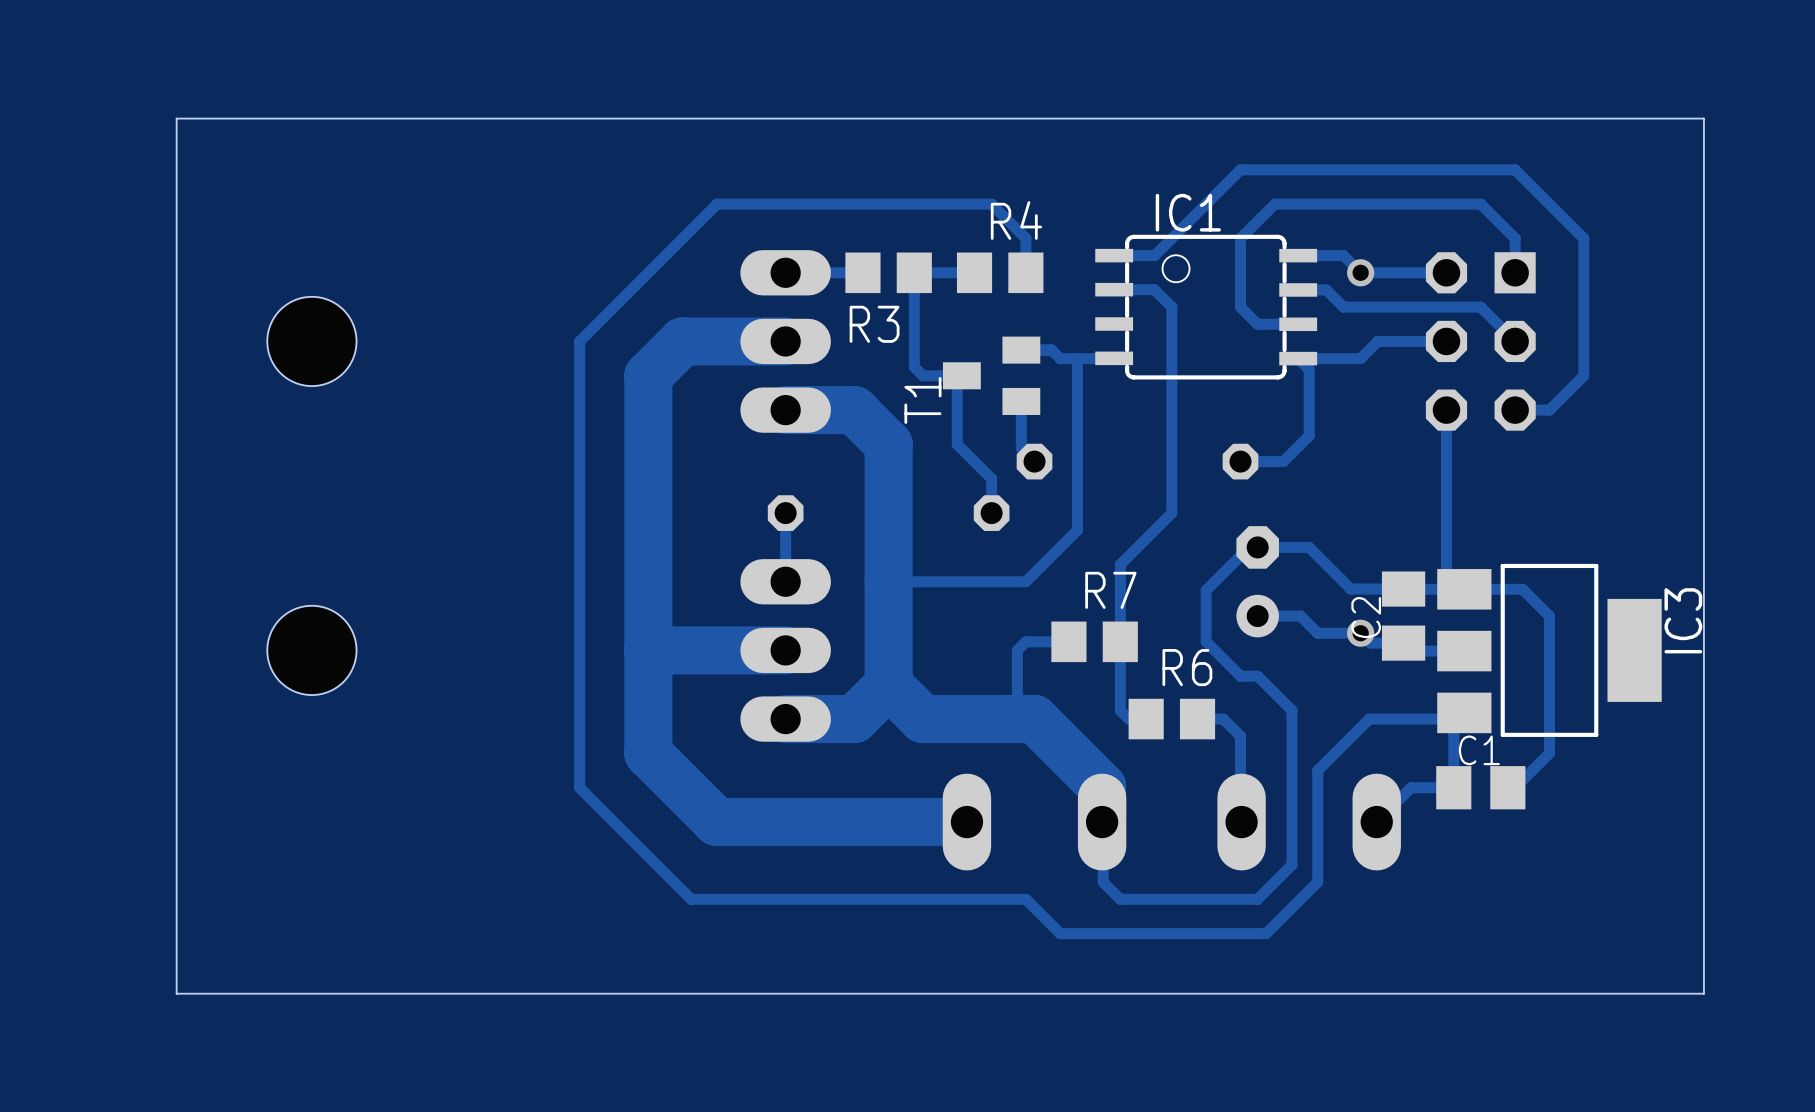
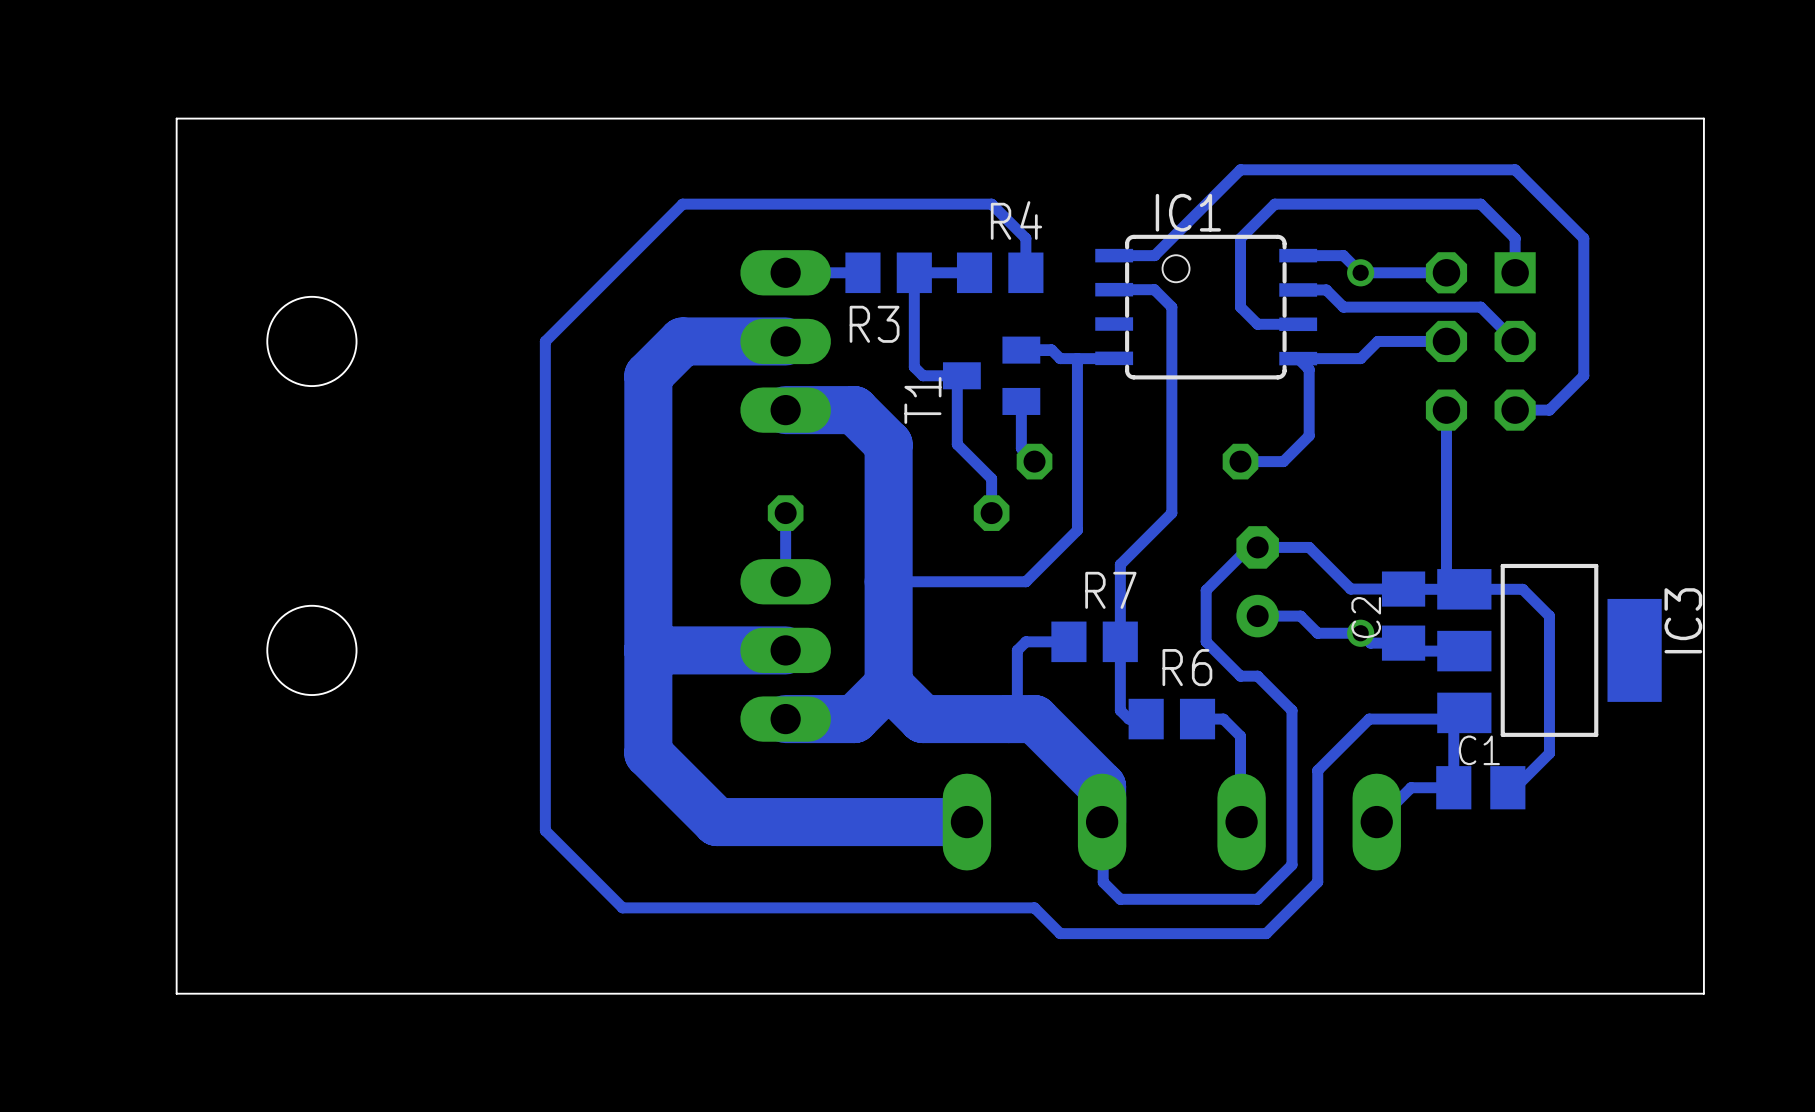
track: (716, 204) (579, 341) (579, 787) (691, 899) (1025, 899) (1034, 907) -> (716, 204) (682, 204) (545, 341) (545, 830) (622, 907) (1034, 907)

